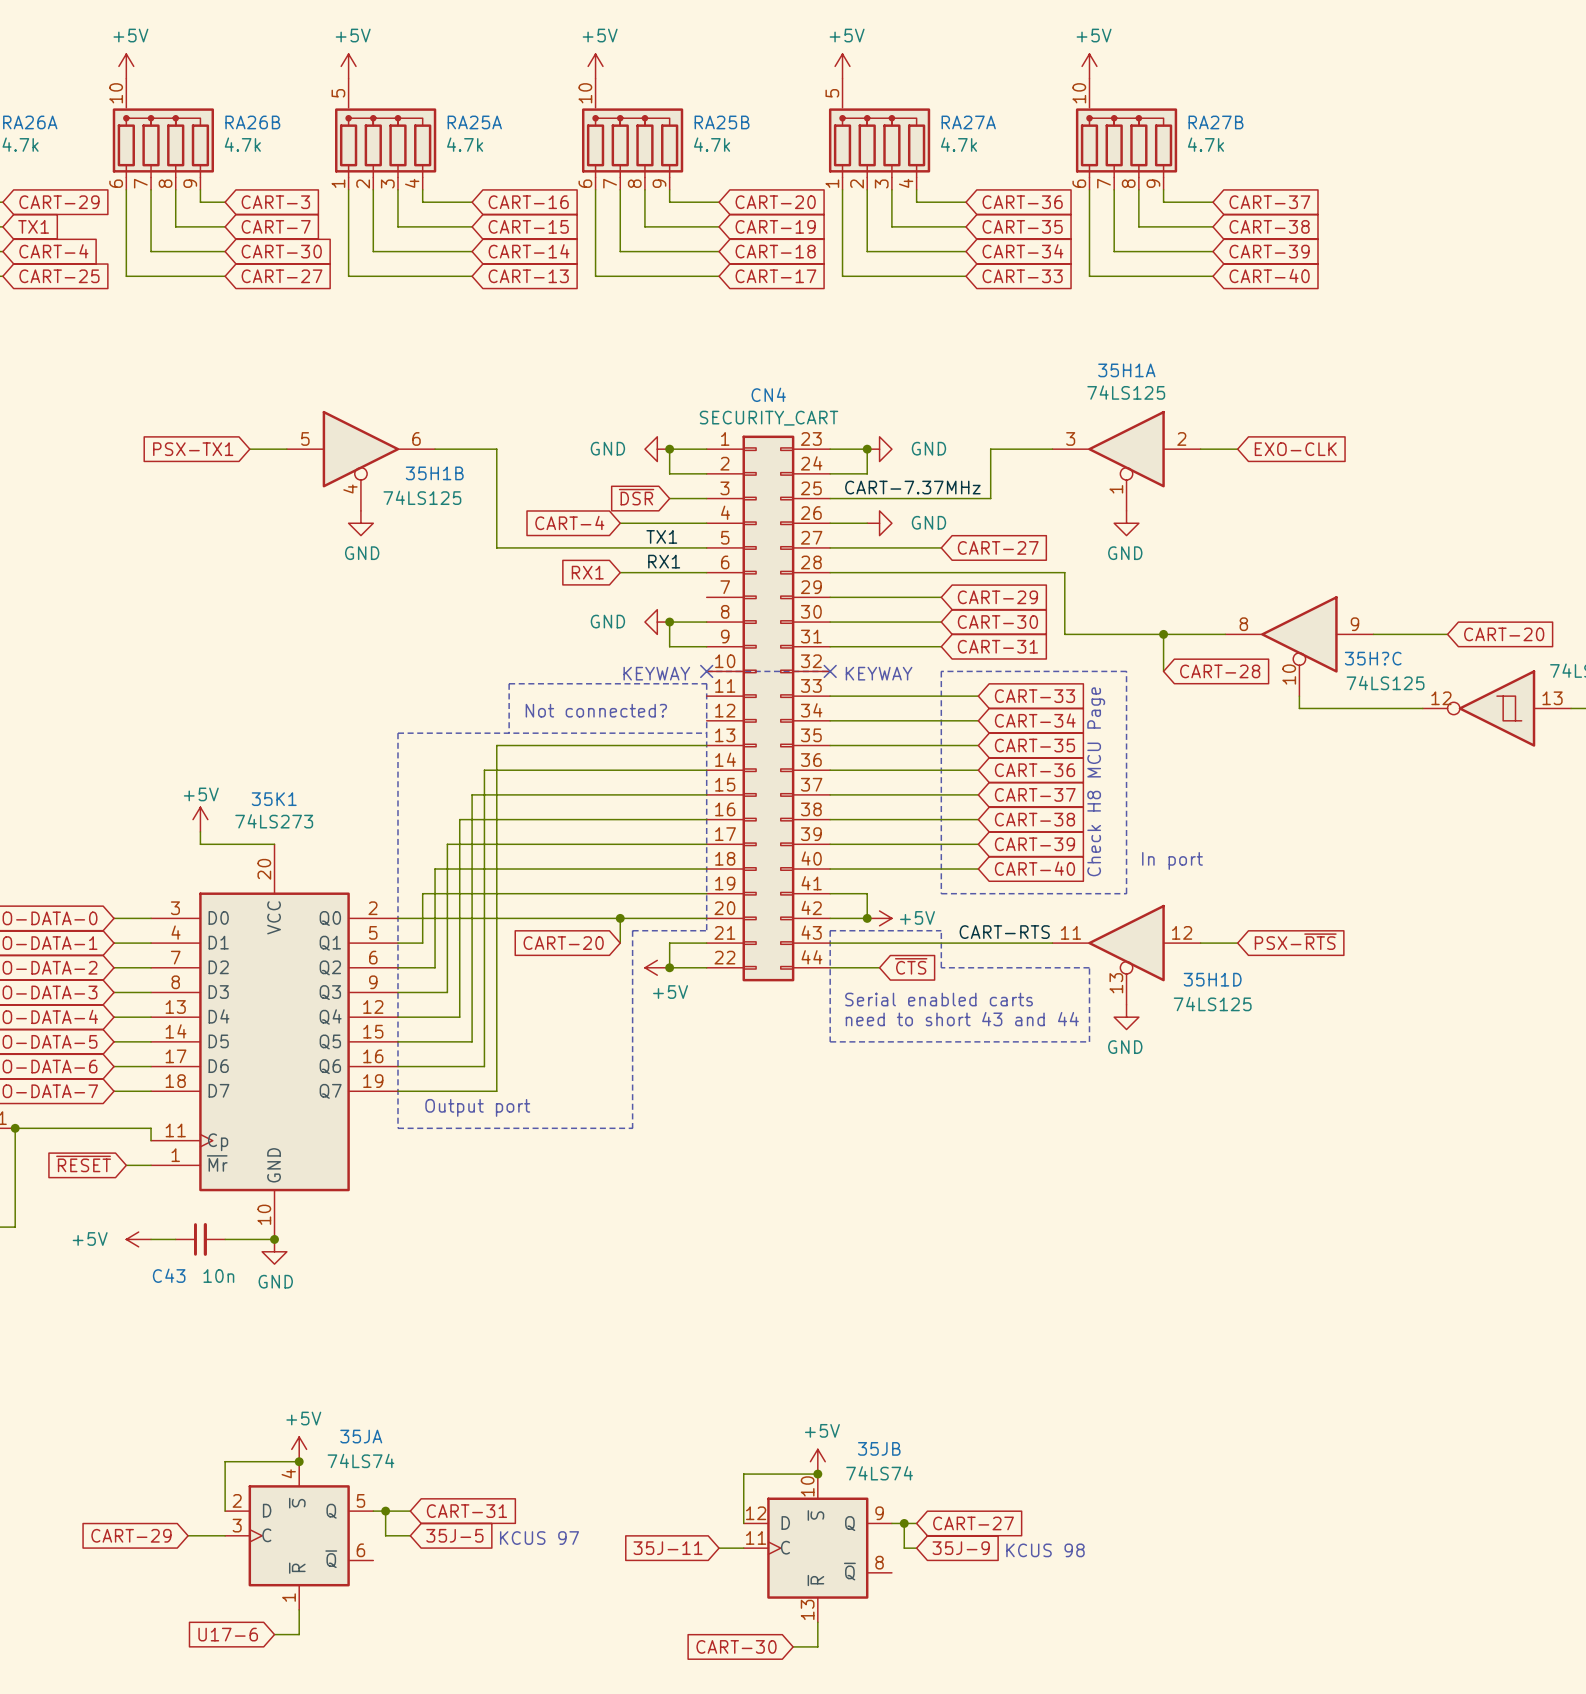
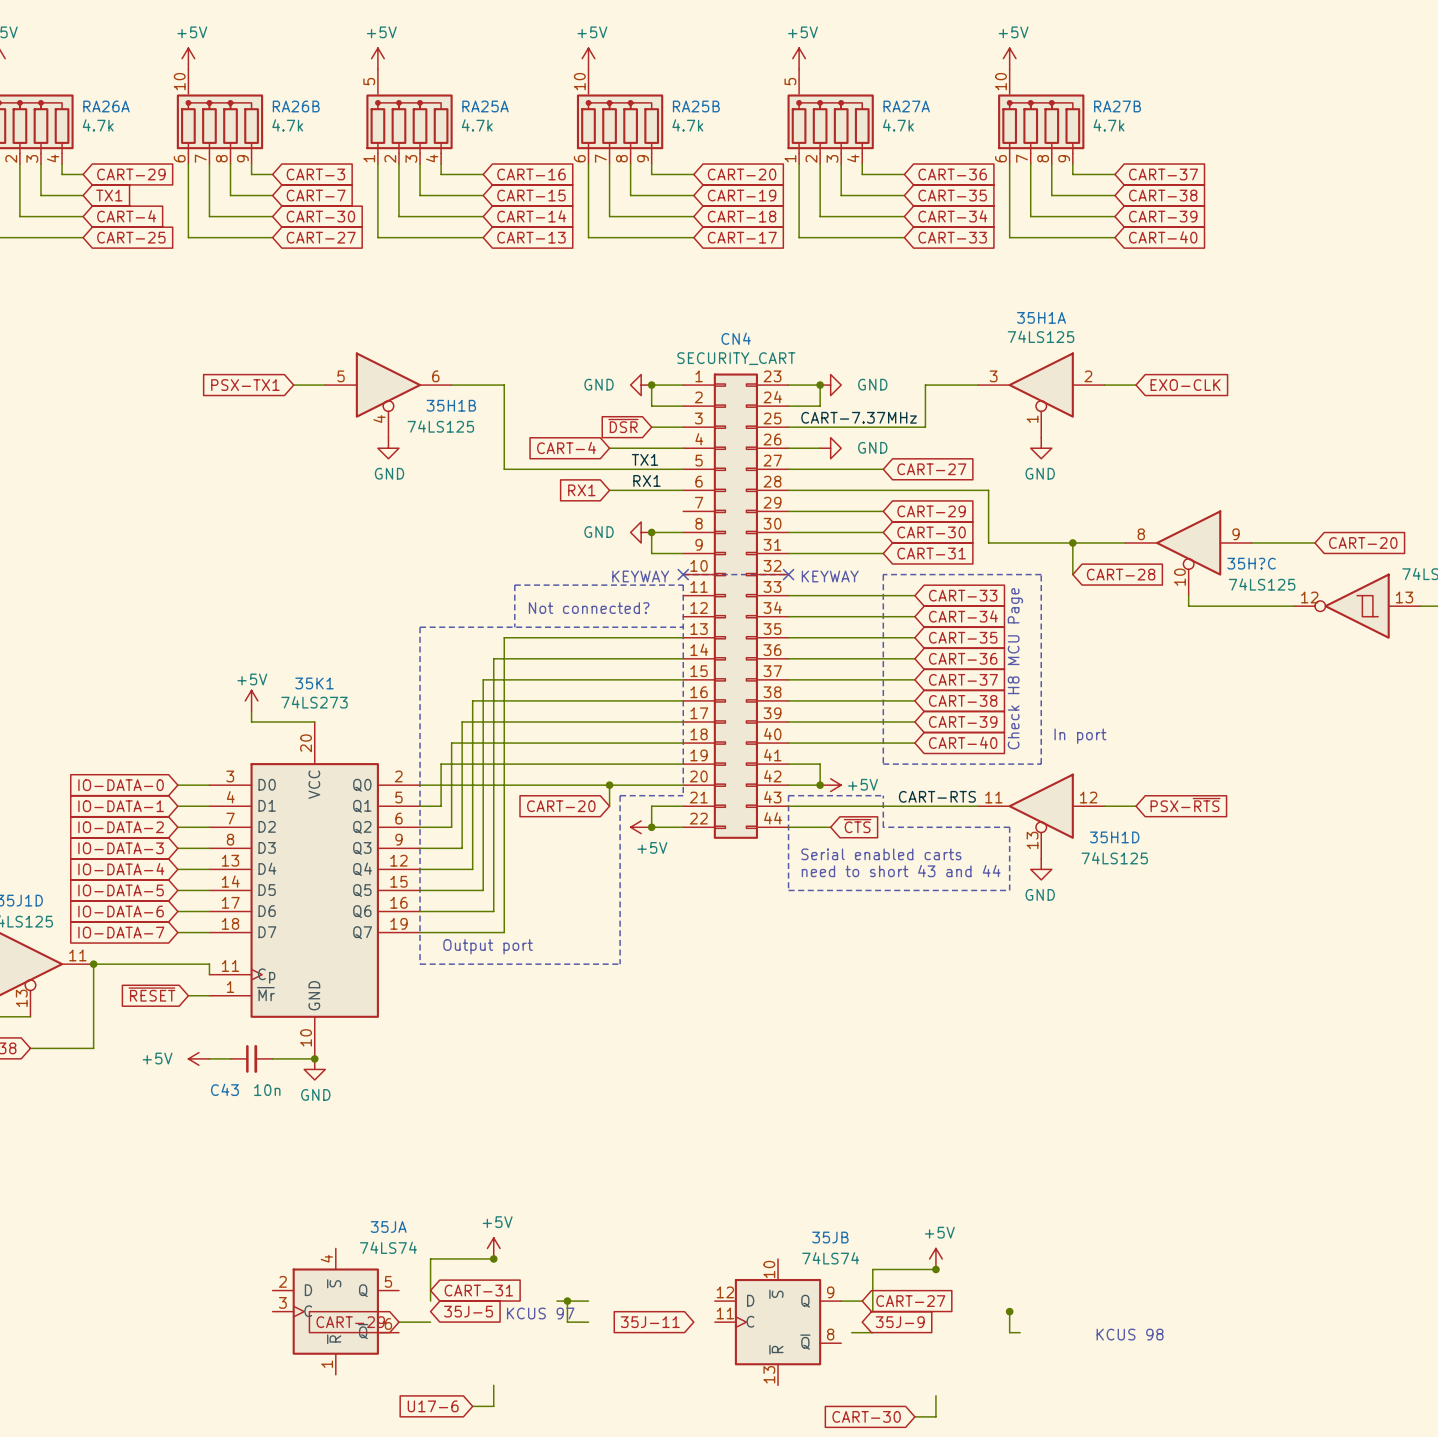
power symbol: +5V (299, 1449) -> none
wire: (299, 1461) (225, 1461) (225, 1511) -> (493, 1258) (430, 1258) (430, 1301)
junction: (299, 1461) -> none
power symbol: none -> +5V (493, 1248)
power symbol: +5V (817, 1461) -> none
junction: none -> (493, 1258)
wire: (817, 1474) (743, 1474) (743, 1523) -> (935, 1269) (872, 1269) (872, 1311)
junction: (817, 1474) -> none
power symbol: none -> +5V (935, 1258)
junction: none -> (935, 1269)
wire: (373, 1511) (410, 1511) -> (556, 1301) (588, 1301)
wire: (385, 1511) (385, 1535) (410, 1535) -> (567, 1301) (567, 1322) (588, 1322)
junction: (385, 1511) -> none
junction: none -> (567, 1301)
wire: (904, 1523) (904, 1548) (916, 1548) -> (1009, 1311) (1009, 1332) (1020, 1332)
junction: (904, 1523) -> none
global label position: CART-29 (131, 1535) -> CART-29 (350, 1322)
wire: (188, 1535) (225, 1535) -> (398, 1322) (430, 1322)
junction: none -> (1009, 1311)
wire: (719, 1548) (743, 1548) -> (851, 1332) (872, 1332)
text position: KCUS 98 (1045, 1550) -> KCUS 98 (1130, 1334)
wire: (299, 1609) (299, 1634) (274, 1634) -> (493, 1385) (493, 1406) (472, 1406)
wire: (817, 1622) (817, 1646) (793, 1646) -> (935, 1395) (935, 1416) (914, 1416)
global label position: U17-6 (228, 1634) -> U17-6 (433, 1406)
global label position: CART-30 (736, 1646) -> CART-30 (866, 1416)

